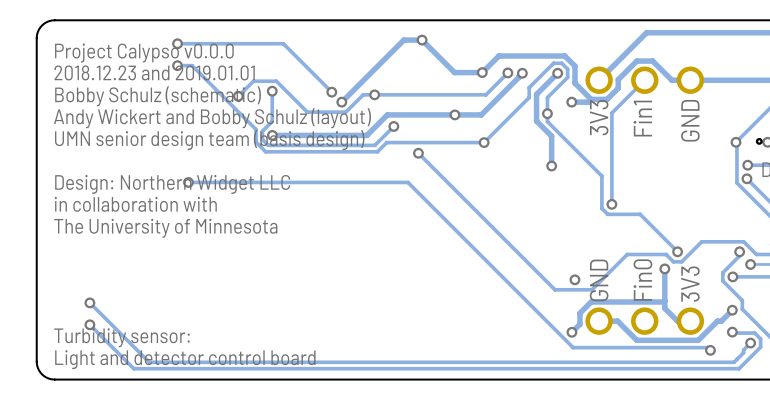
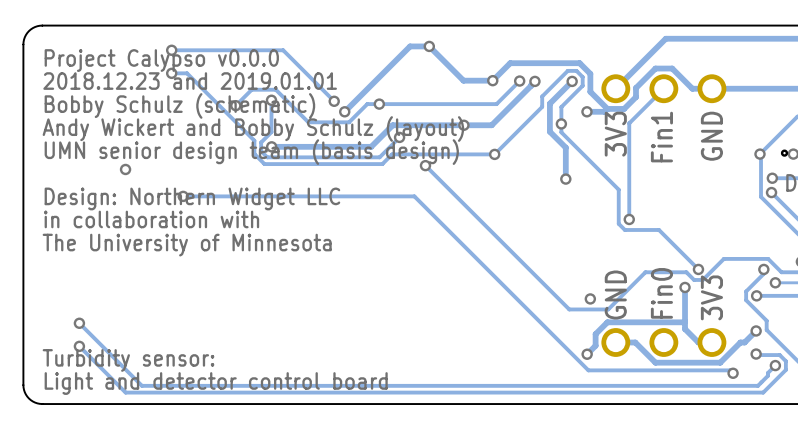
via: none -> (125, 169)

